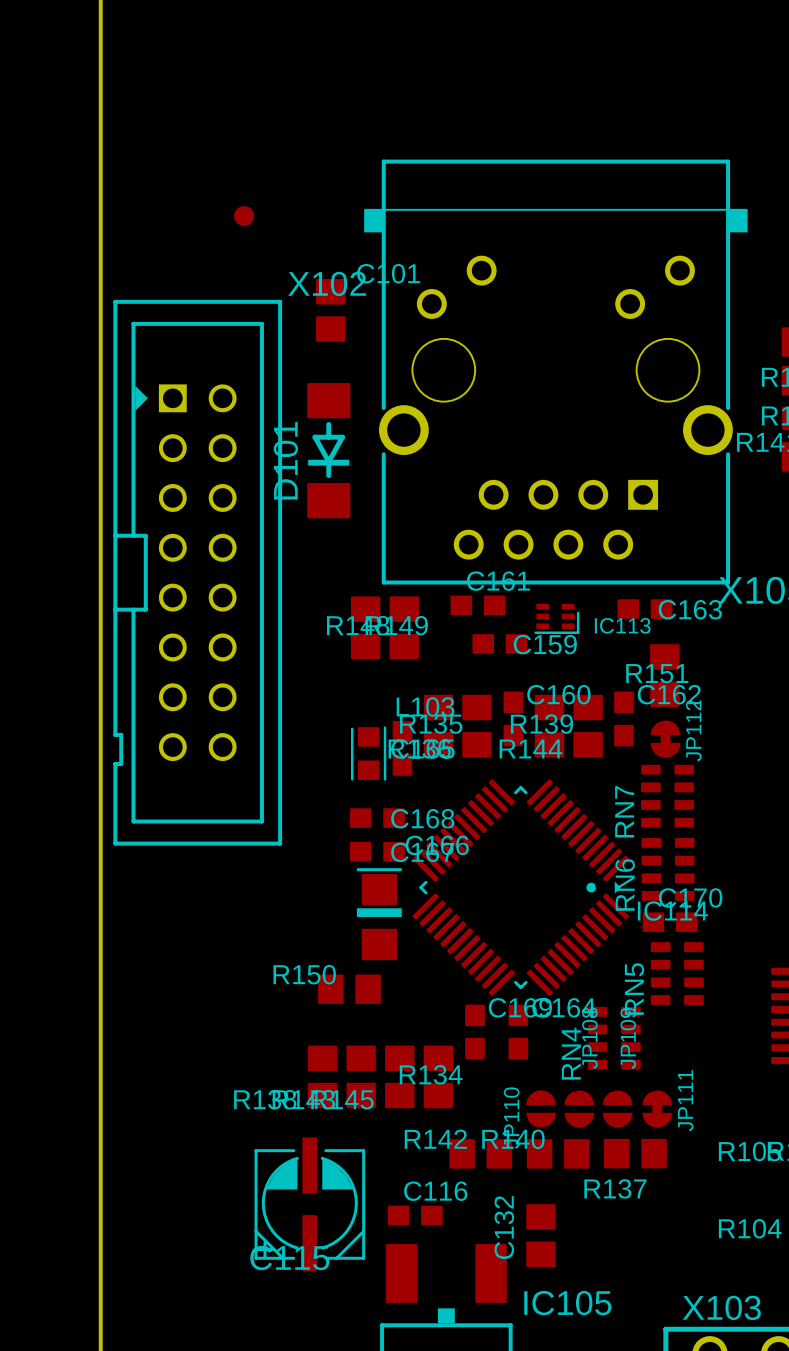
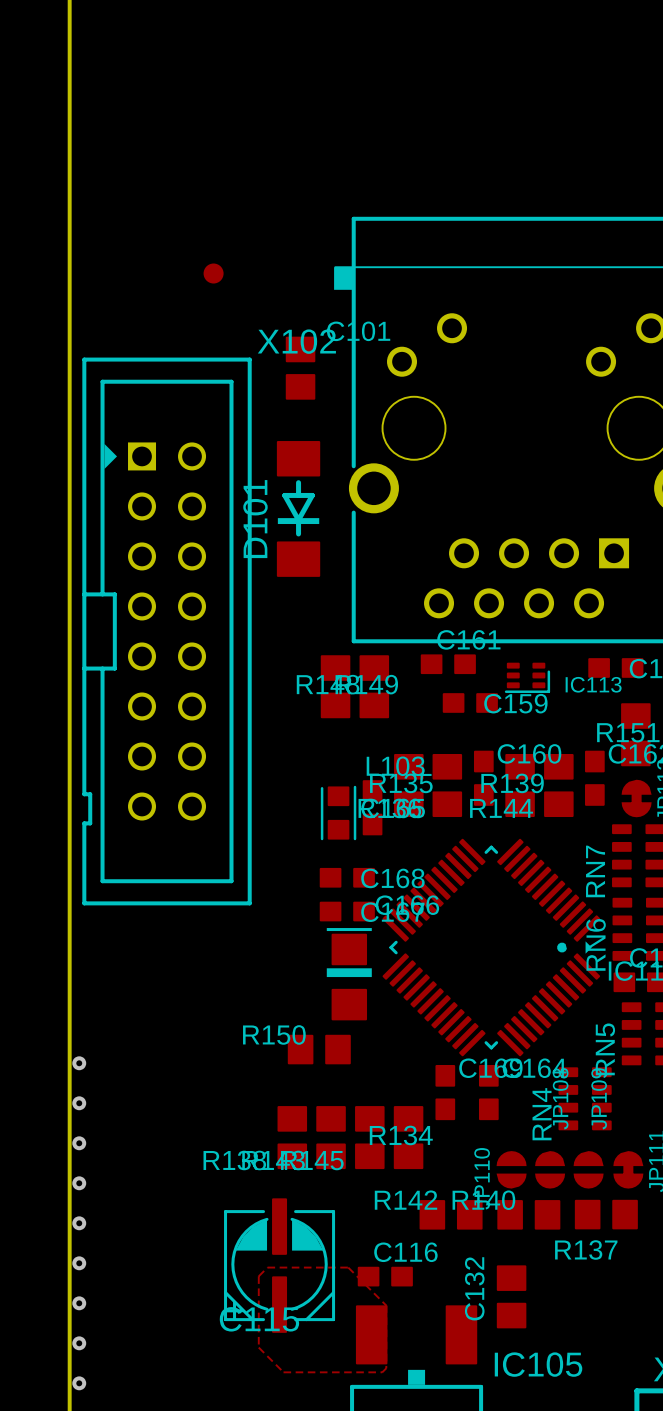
via: none -> (79, 1063)
via: none -> (79, 1103)
via: none -> (79, 1143)
via: none -> (79, 1183)
via: none -> (79, 1223)
via: none -> (79, 1263)
zone outline: none -> (267, 1267) (258, 1276) (258, 1347) (283, 1372) (382, 1372) (386, 1368) (386, 1305) (348, 1267) (267, 1267)
via: none -> (79, 1303)
via: none -> (79, 1343)
via: none -> (79, 1383)

